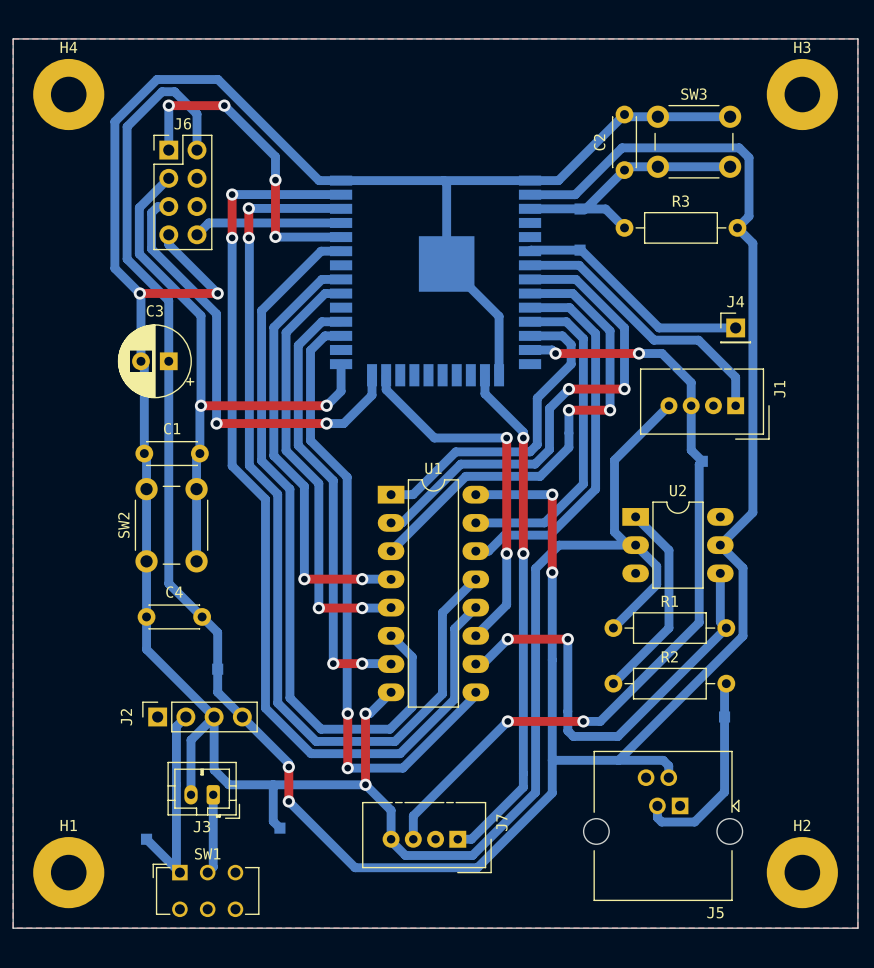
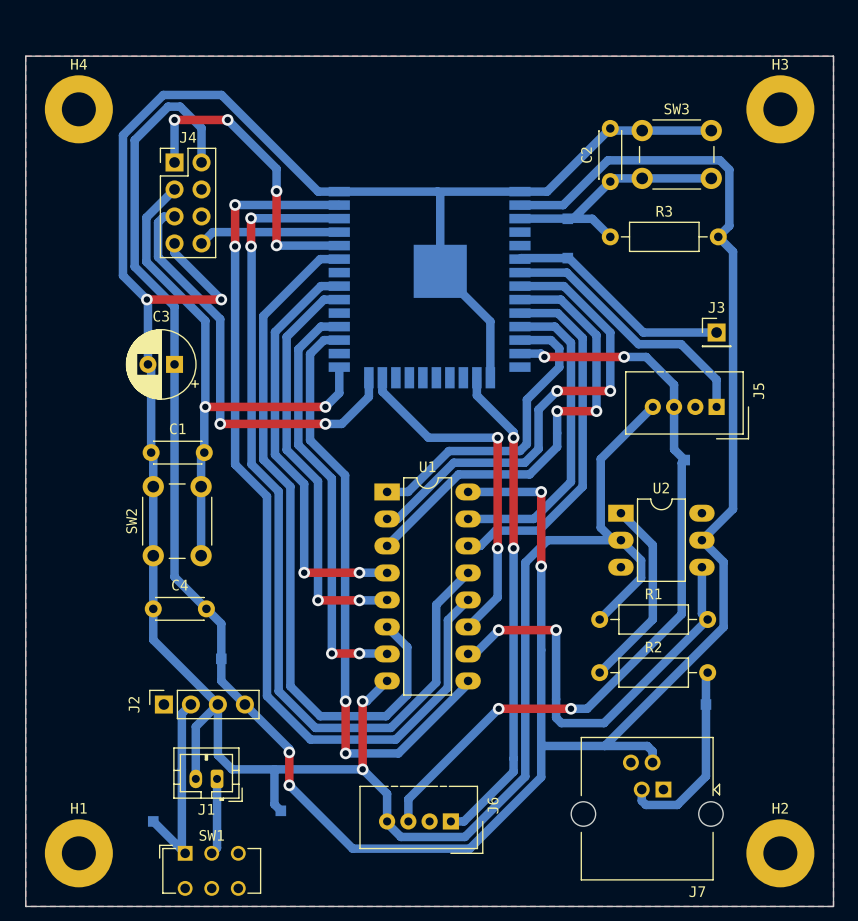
J6 name: J6 (182, 123) -> J4 (188, 137)
J4 name: J4 (735, 301) -> J3 (716, 307)
J1 name: J1 (779, 389) -> J5 (758, 391)
J7 name: J7 (501, 822) -> J6 (493, 805)
J3 name: J3 (201, 826) -> J1 (206, 809)
J5 name: J5 (715, 912) -> J7 (697, 891)

